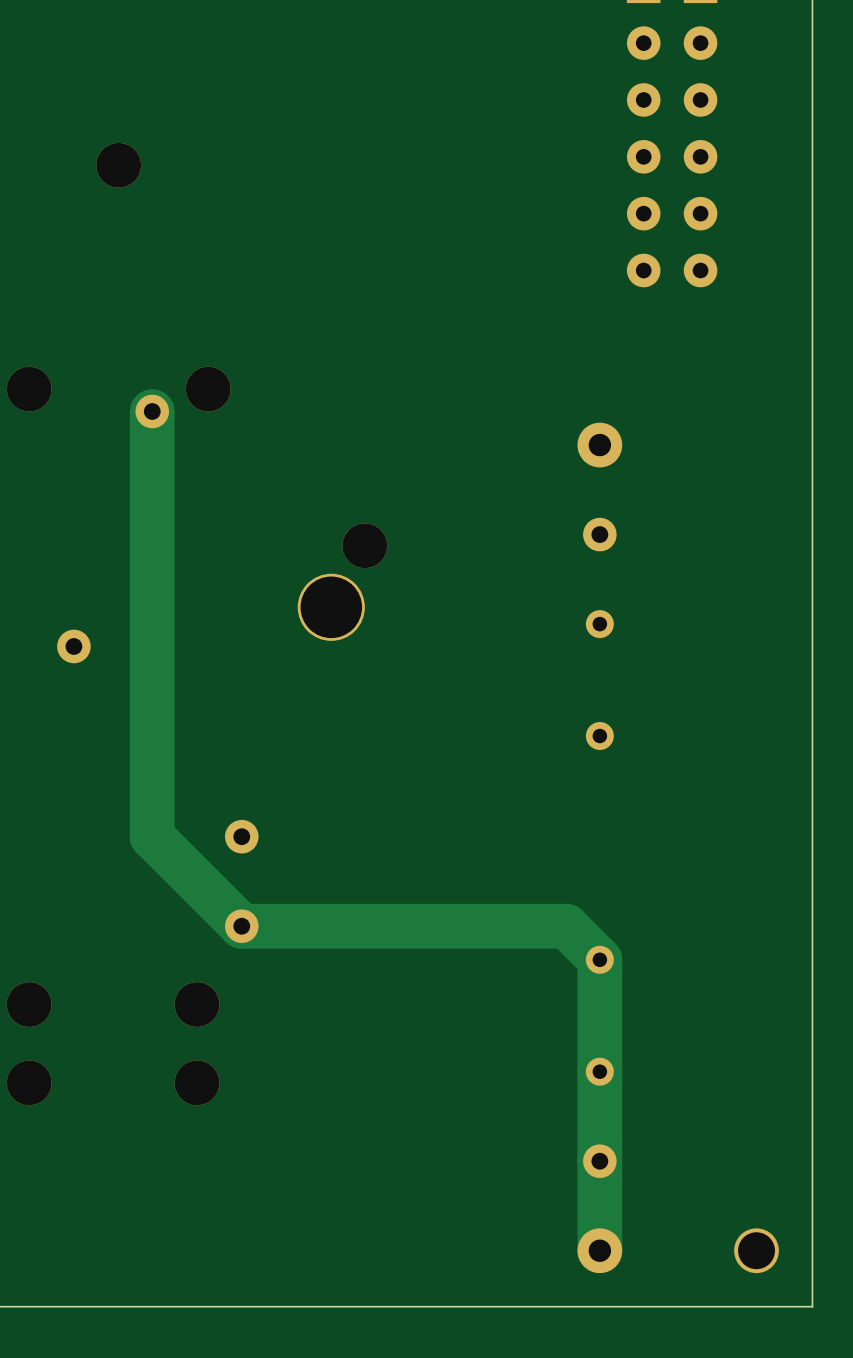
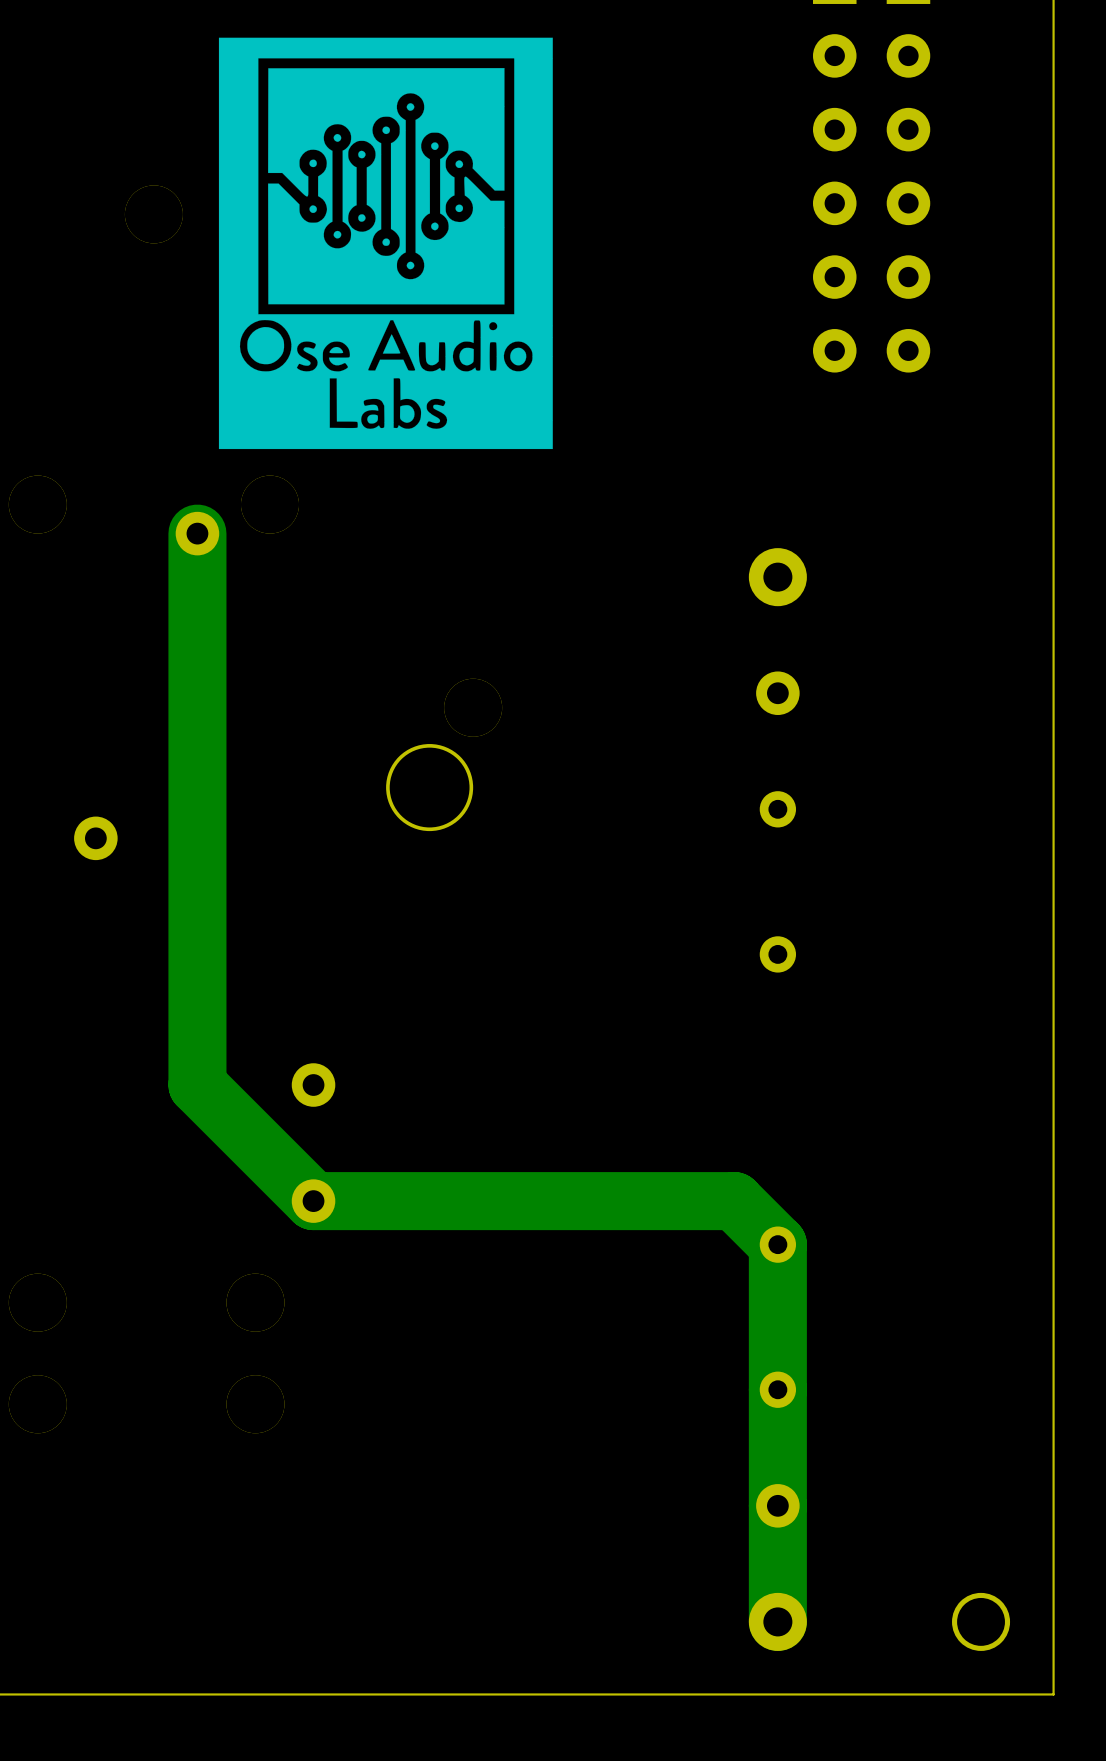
drawing: none -> [218, 37, 553, 450]

